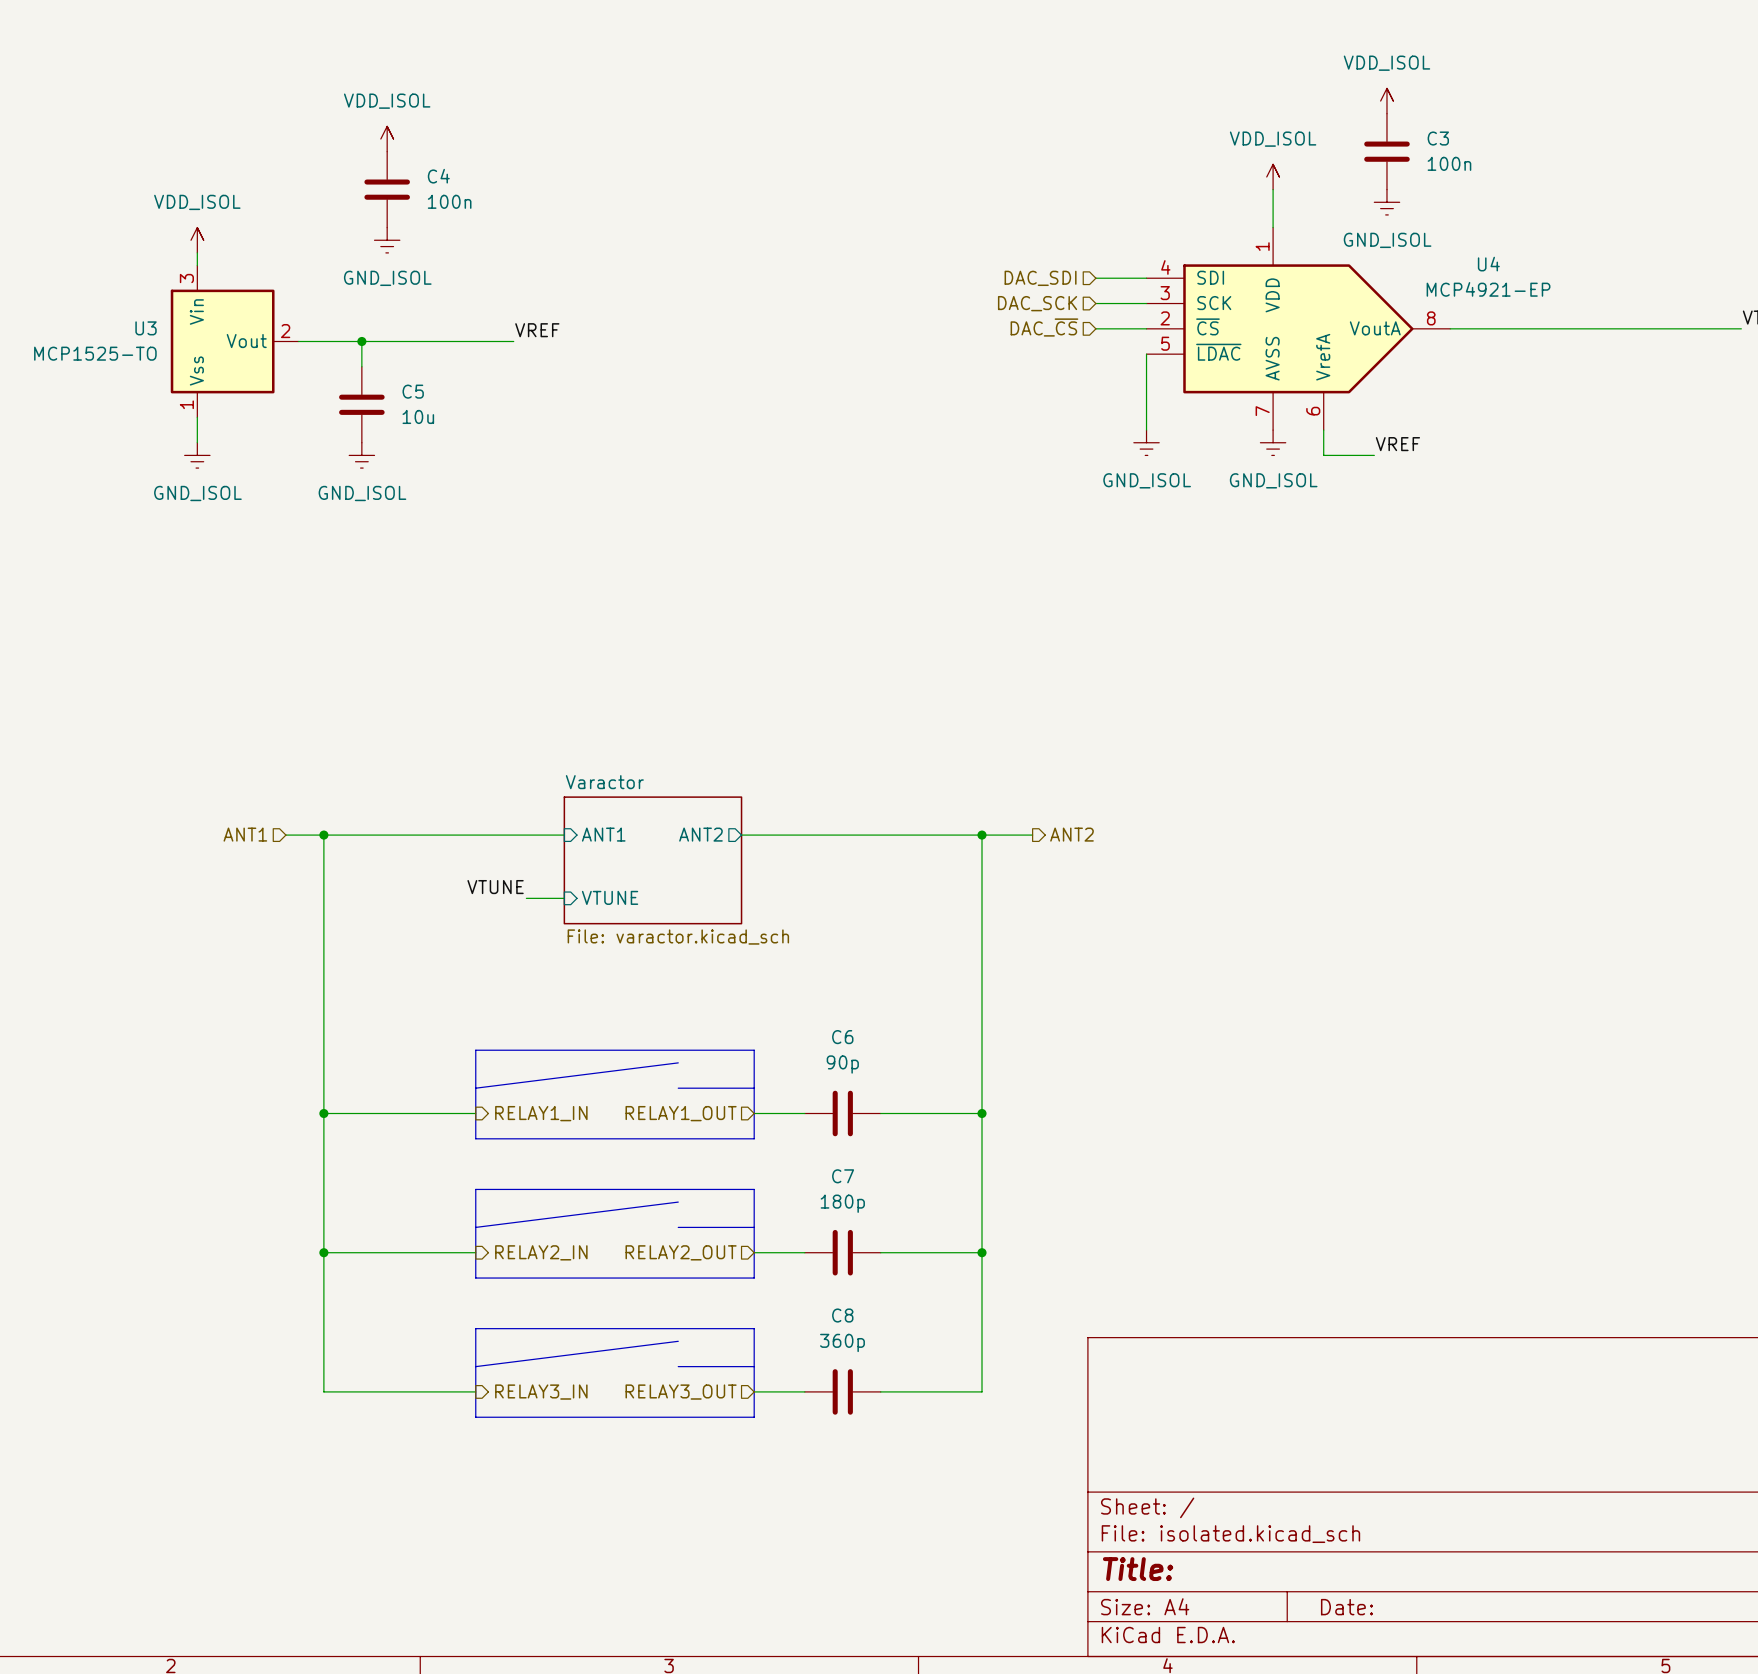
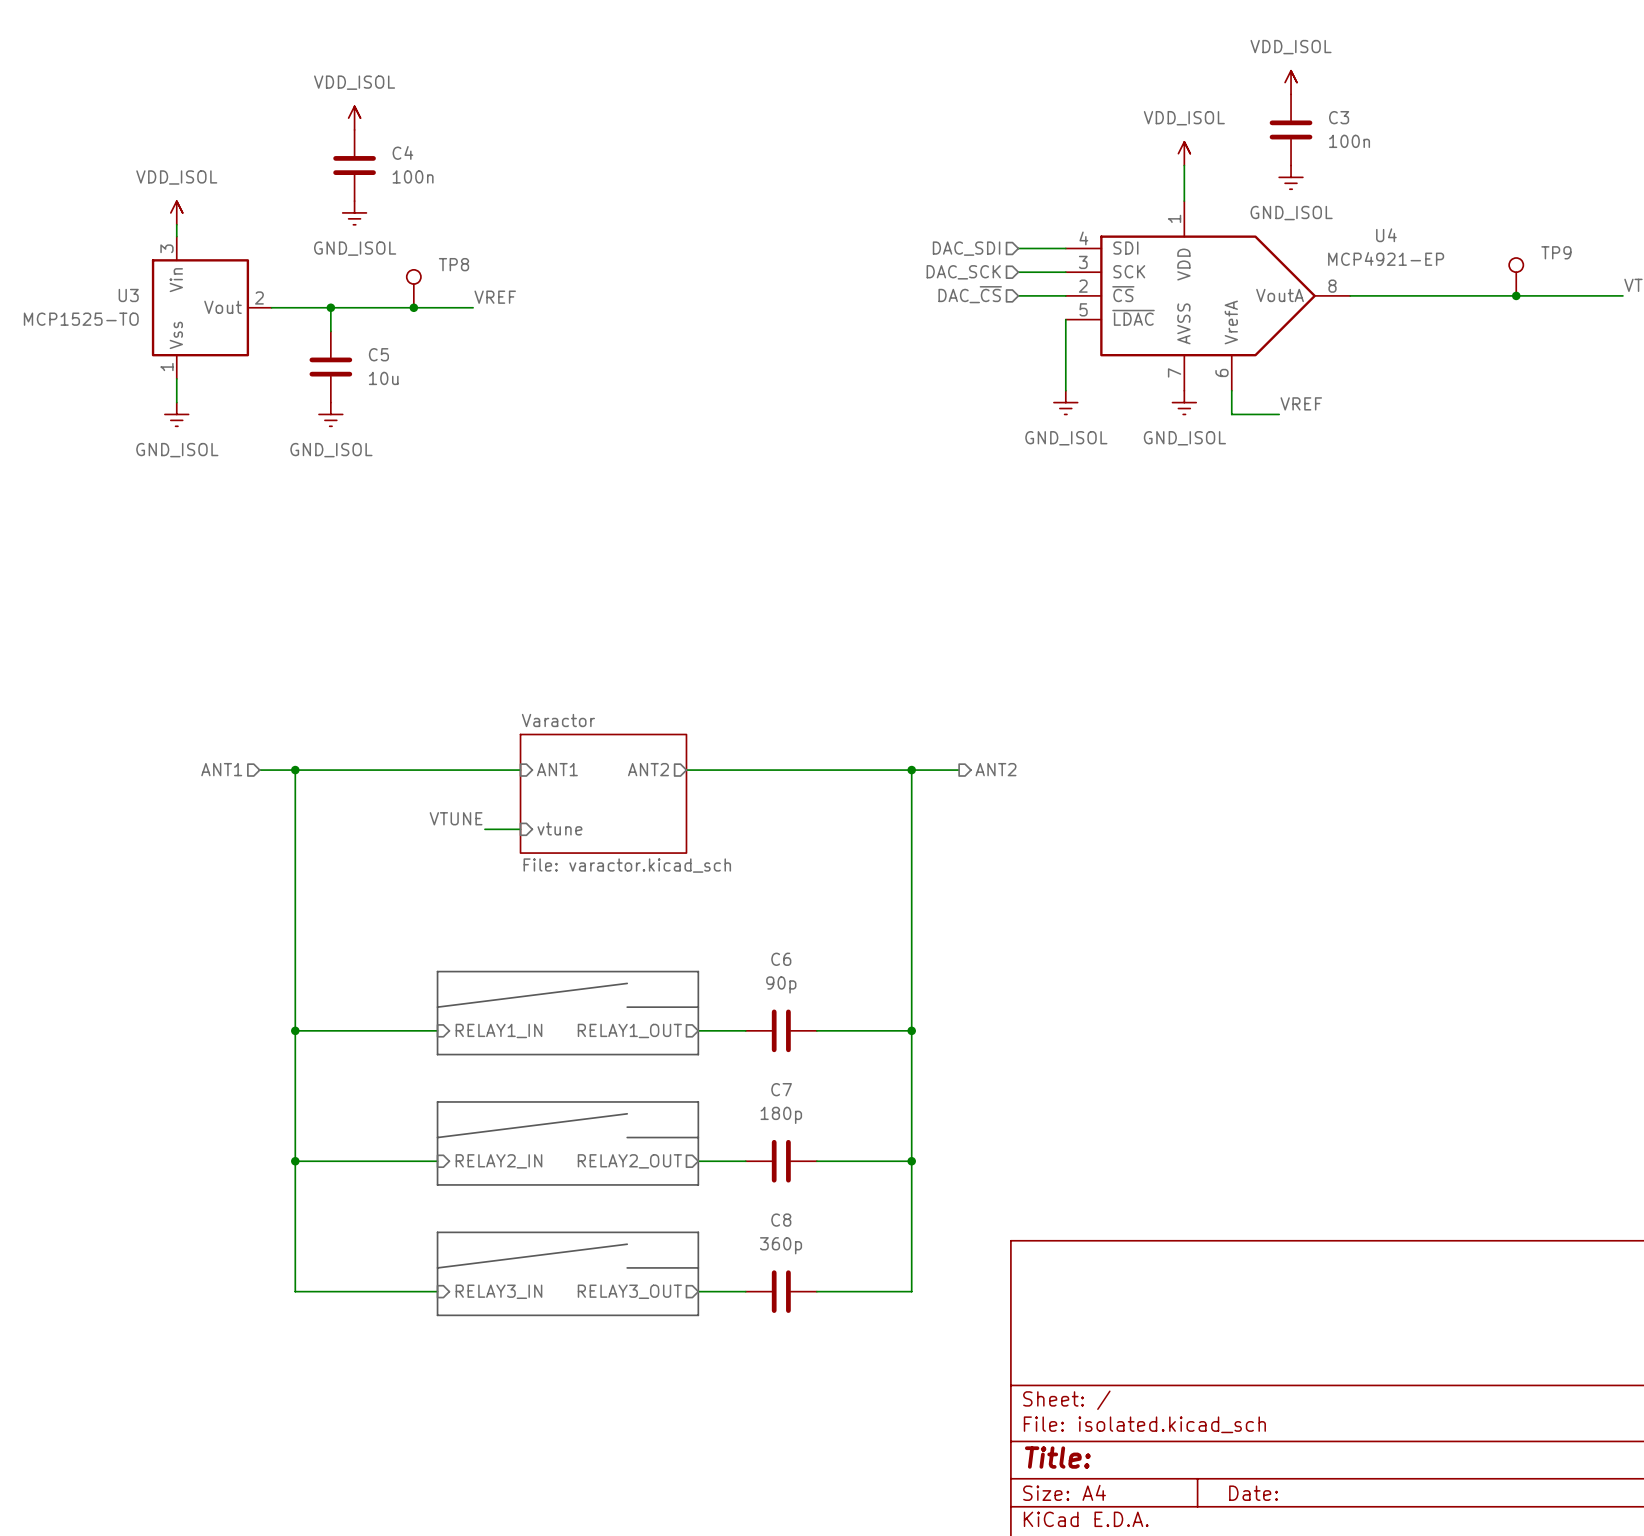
TP9: none -> (1516, 276)
TP8: none -> (413, 288)
junction: none -> (1516, 295)
junction: none -> (413, 307)
sheet pin: VTUNE (610, 897) -> vtune (559, 828)

